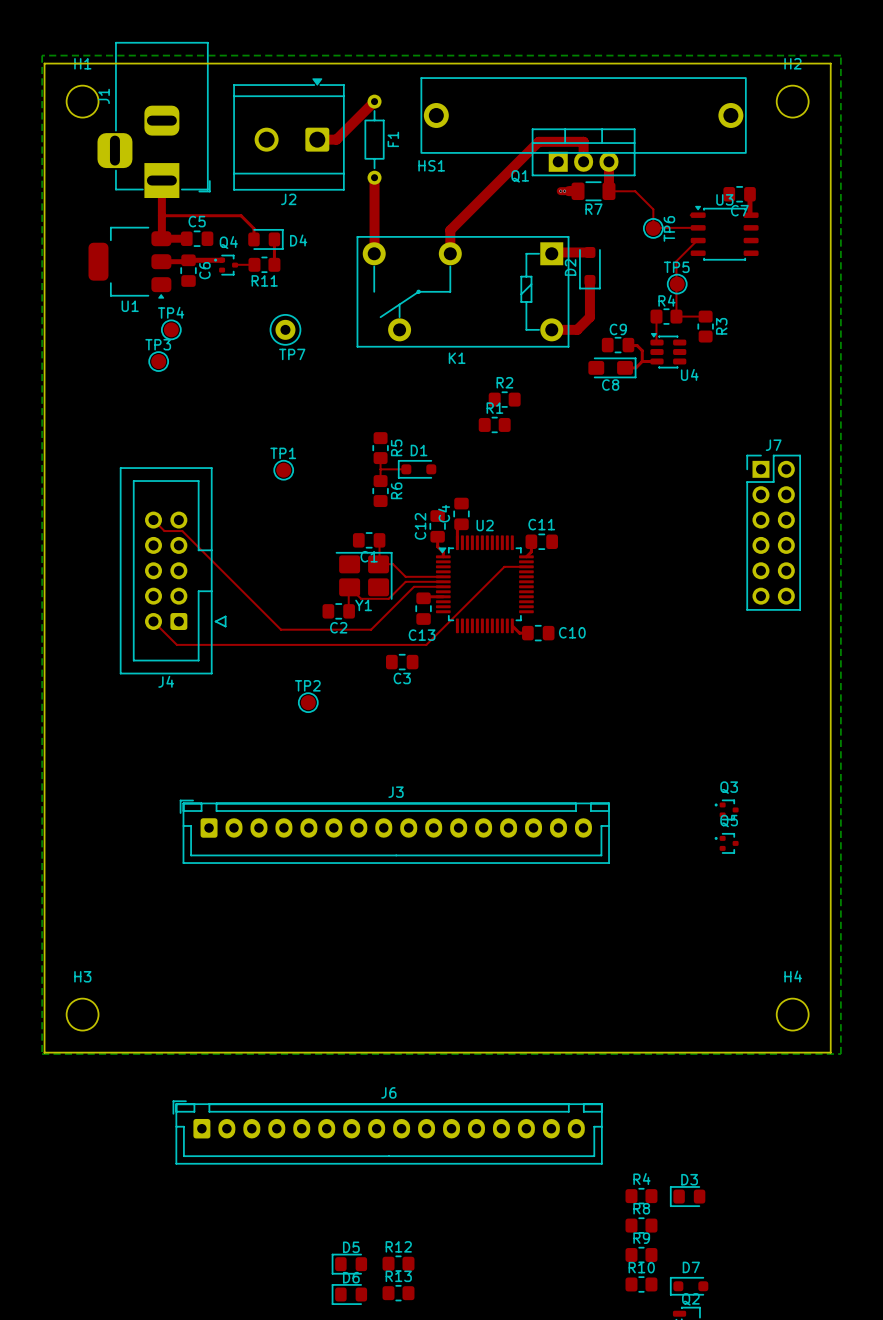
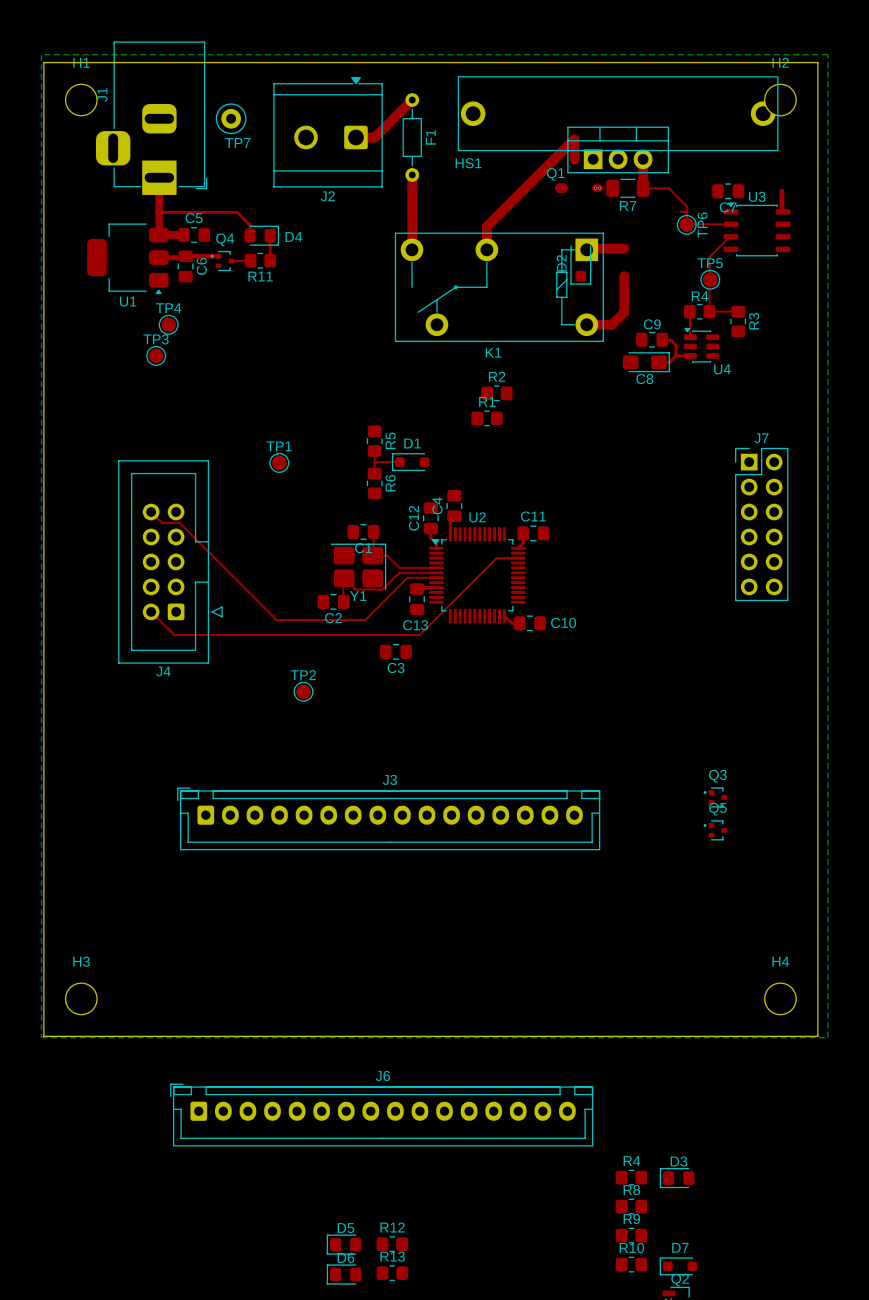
top track: (374, 101) (336, 139) (317, 139) -> (412, 100) (374, 137) (355, 137)
HS1 position: (583, 115) -> (618, 113)
J2 position: (288, 134) -> (328, 132)
F1 position: (374, 139) -> (412, 137)
top track: (582, 141) (538, 141) (450, 230) (450, 253) -> (573, 139) (486, 226) (486, 249)
Q1 position: (583, 152) -> (618, 149)
top track: (608, 161) (608, 191) (635, 191) (653, 209) (653, 228) (698, 227) -> (643, 159) (643, 188) (668, 188) (686, 206) (686, 224) (730, 224)
top track: (374, 177) (374, 253) -> (412, 174) (411, 249)
top track: (560, 191) (564, 191) -> (595, 188) (599, 188)
via: (560, 191) -> none
via: (564, 191) -> none
R7 position: (593, 191) -> (627, 188)
via: none -> (595, 188)
via: none -> (599, 188)
top track: (749, 194) (751, 215) -> (781, 191) (783, 211)
TP6 position: (653, 228) -> (686, 224)
U3 position: (724, 233) -> (756, 229)
top track: (698, 240) (676, 261) (676, 316) (705, 316) -> (730, 236) (709, 257) (709, 311) (738, 311)
top track: (589, 252) (551, 253) -> (624, 248) (586, 249)
top track: (589, 280) (589, 317) (577, 329) (551, 329) -> (624, 276) (624, 312) (611, 324) (586, 324)
TP5 position: (677, 284) -> (710, 279)
K1 position: (463, 291) -> (499, 287)
top track: (656, 316) (656, 342) -> (689, 311) (690, 337)
R4 position: (666, 316) -> (699, 311)
R3 position: (705, 326) -> (738, 321)
TP7 position: (285, 329) -> (231, 118)
C9 position: (618, 345) -> (652, 339)
top track: (628, 345) (637, 345) (642, 350) (642, 361) -> (662, 339) (670, 340) (675, 345) (675, 355)
U4 position: (668, 350) -> (701, 345)
top track: (642, 361) (656, 361) -> (675, 355) (690, 355)
top track: (642, 361) (635, 367) (625, 367) -> (675, 355) (669, 362) (658, 362)
C8 position: (612, 367) -> (646, 362)

